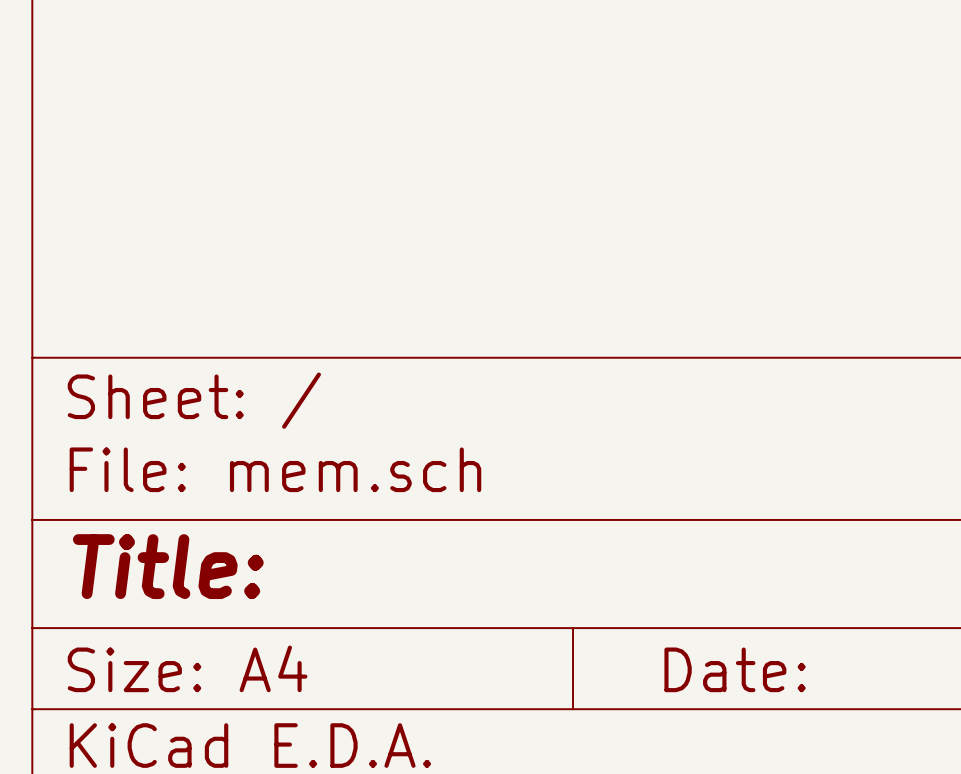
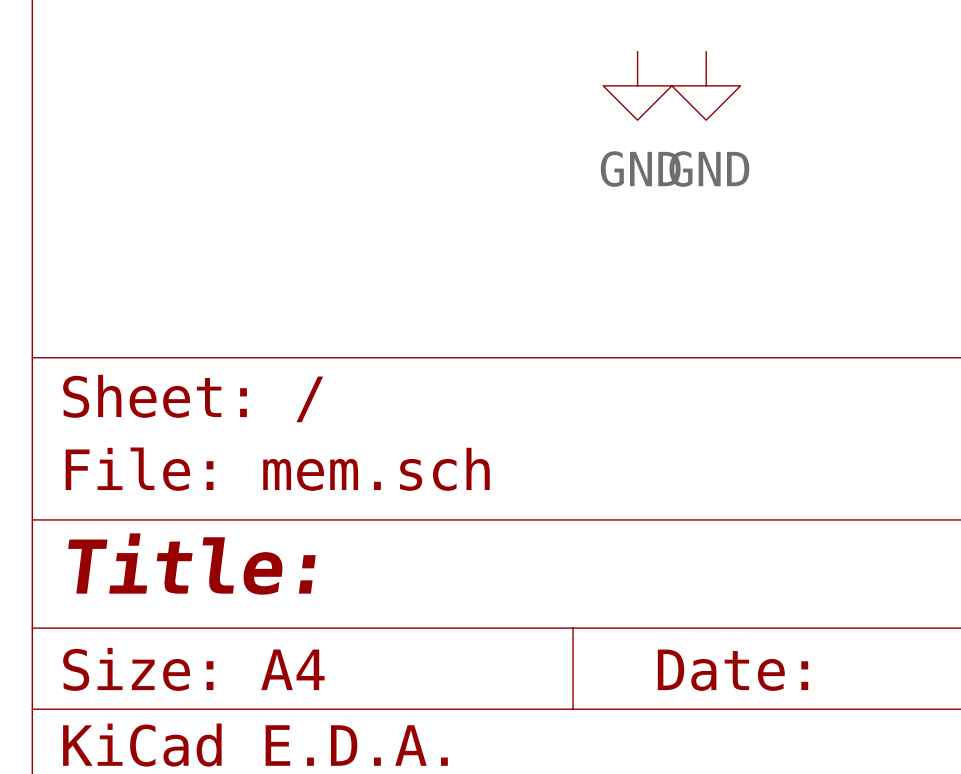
power symbol: none -> GND (637, 85)
power symbol: none -> GND (706, 85)

